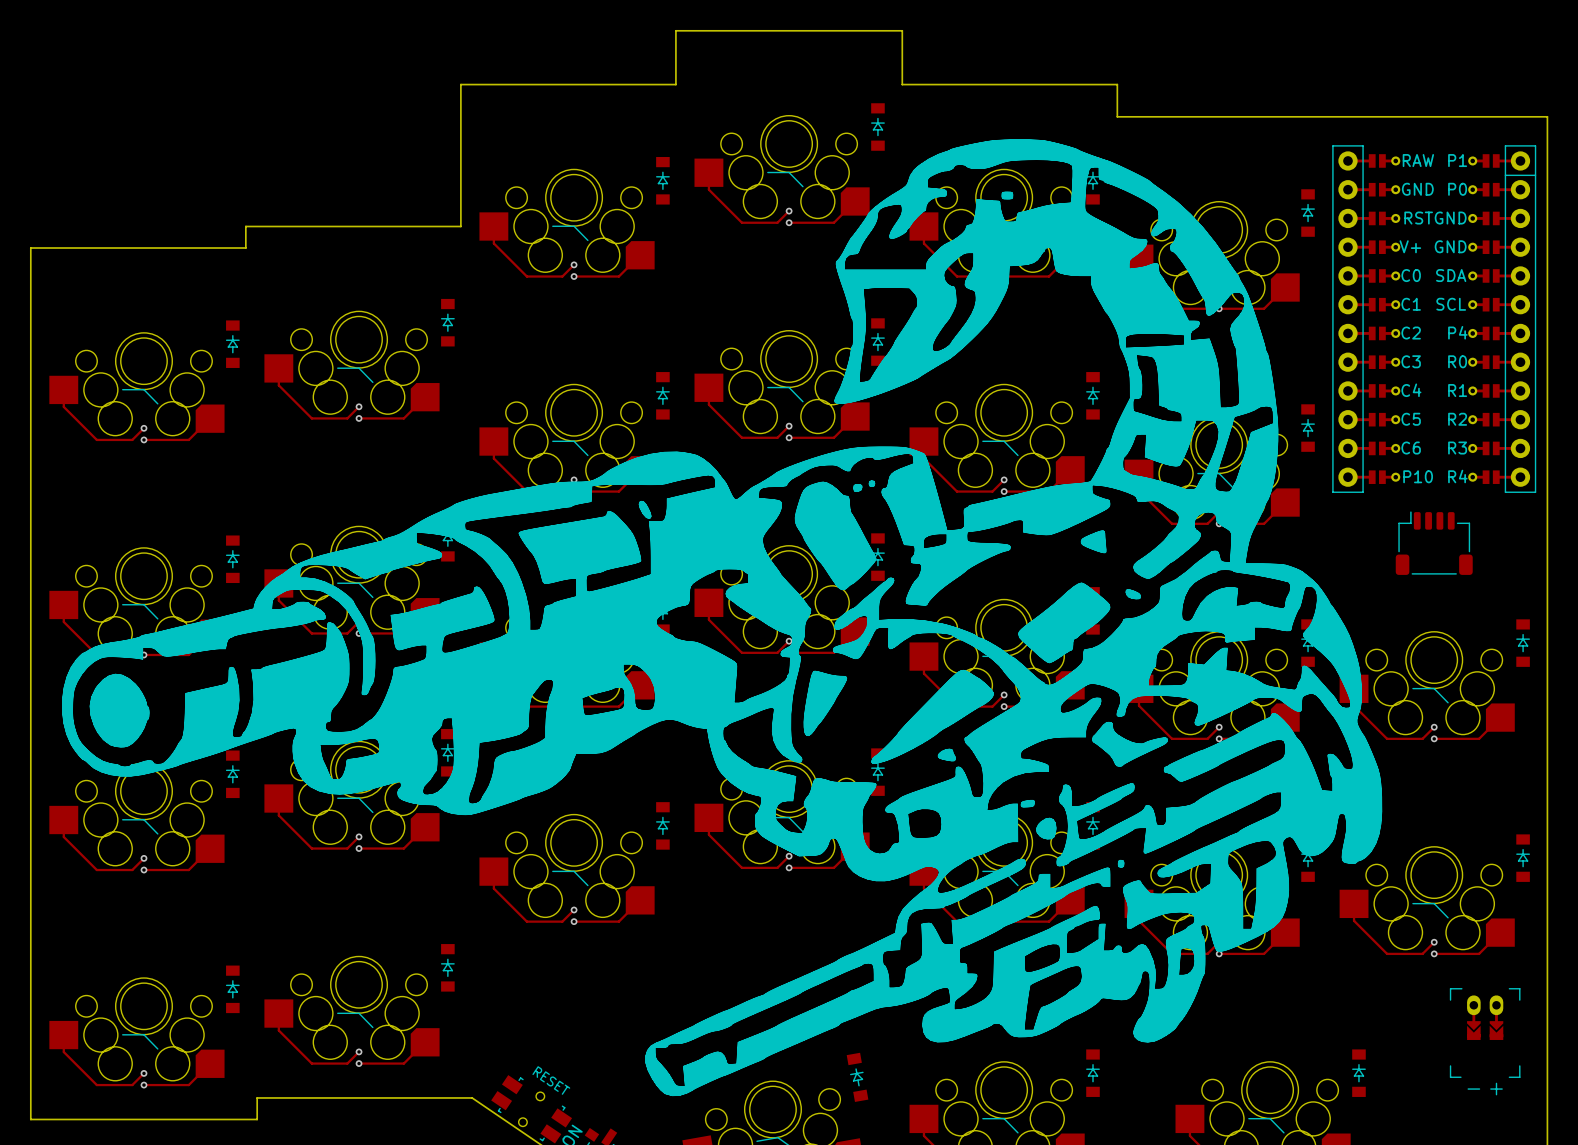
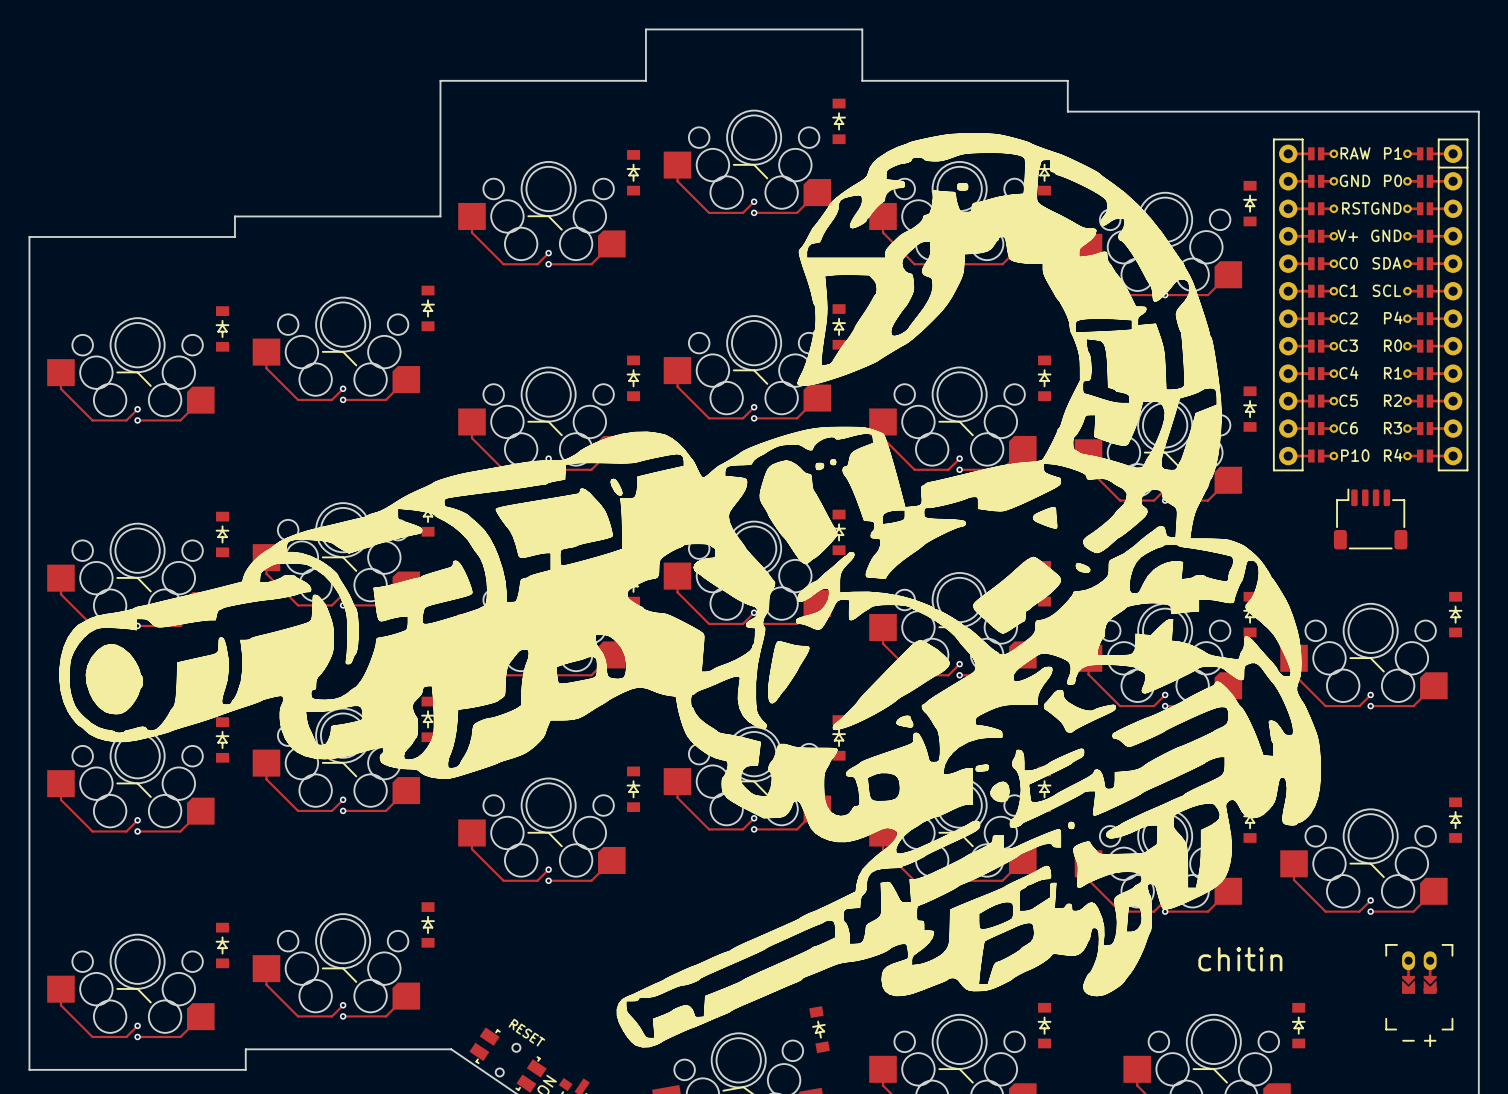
drawing shape: [62, 139, 1383, 1097] -> [59, 133, 1321, 1048]

